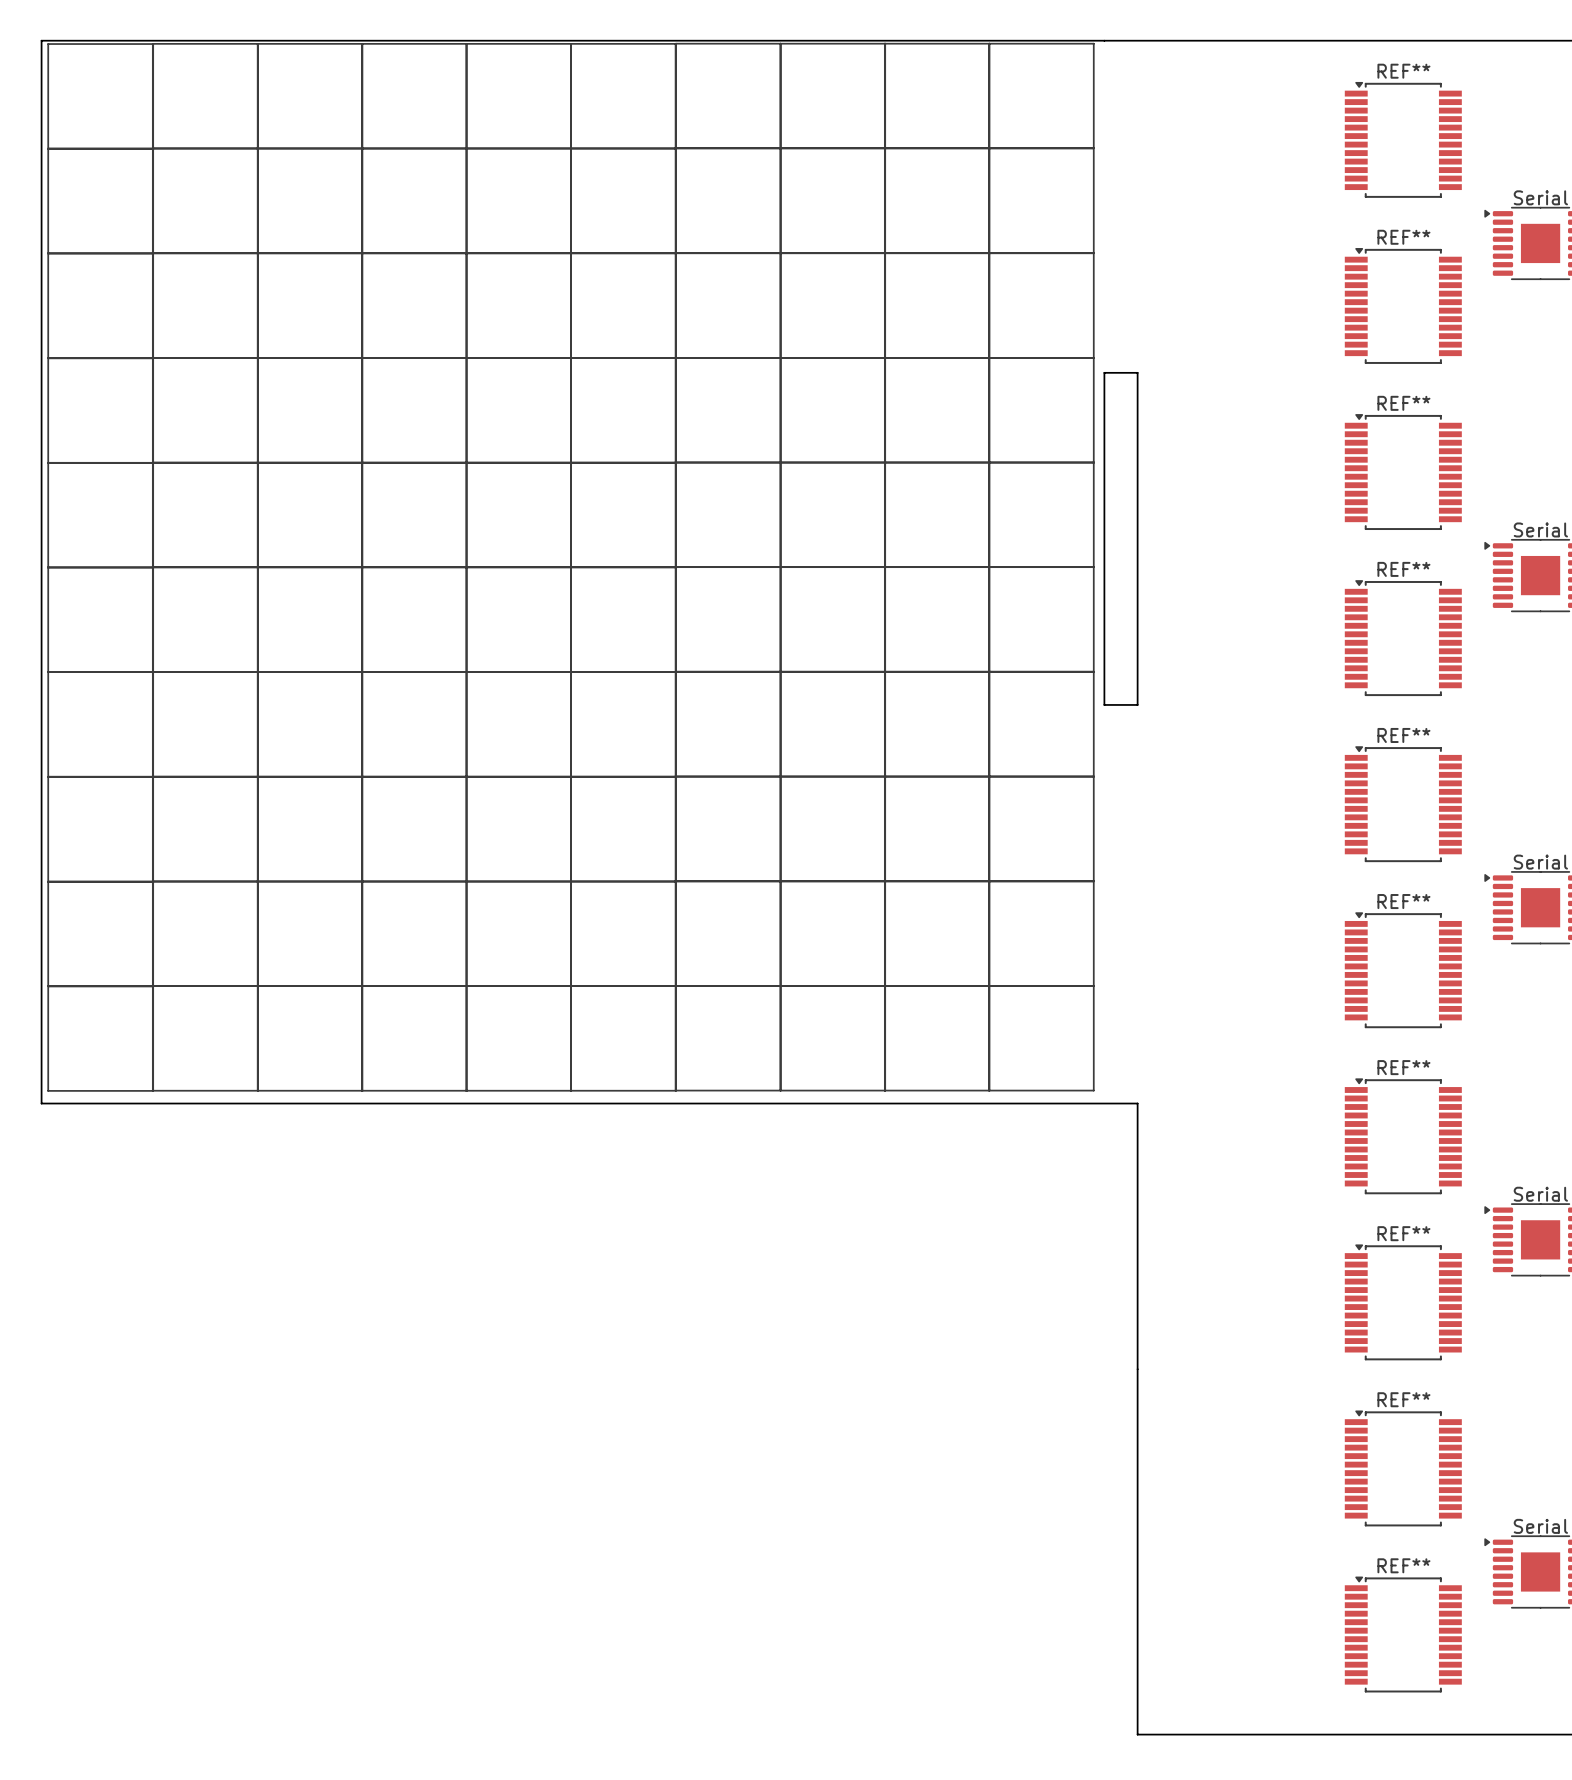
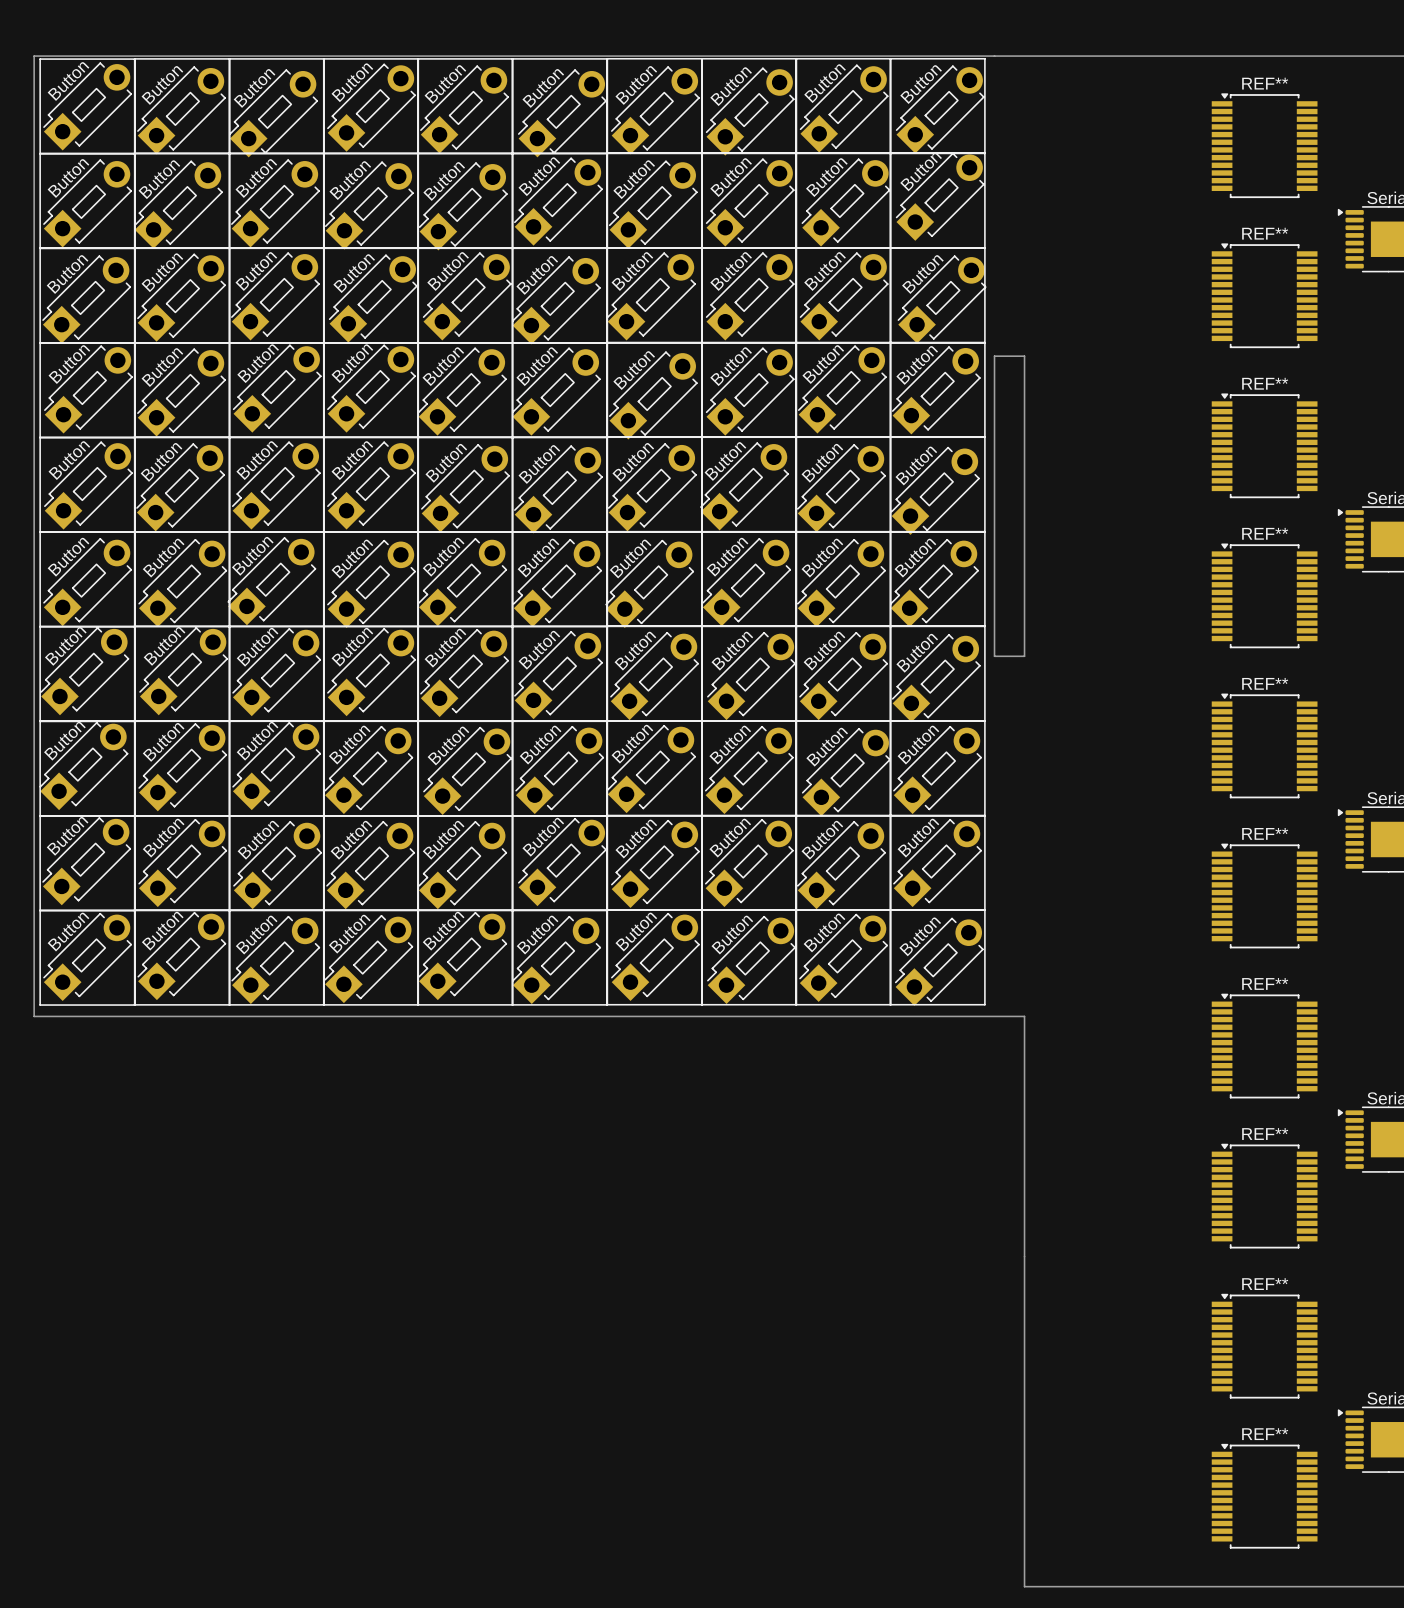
Button: none -> (87, 106)
Button: none -> (371, 107)
Button: none -> (844, 108)
Button: none -> (464, 109)
Button: none -> (940, 109)
Button: none -> (181, 110)
Button: none -> (655, 110)
Button: none -> (750, 111)
Button: none -> (273, 113)
Button: none -> (562, 113)
Button: none -> (940, 196)
Button: none -> (558, 201)
Button: none -> (750, 202)
Button: none -> (845, 202)
Button: none -> (87, 203)
Button: none -> (275, 203)
Button: none -> (178, 204)
Button: none -> (653, 204)
Button: none -> (369, 205)
Button: none -> (463, 206)
Button: none -> (275, 296)
Button: none -> (467, 296)
Button: none -> (651, 296)
Button: none -> (750, 296)
Button: none -> (844, 296)
Button: none -> (181, 297)
Button: none -> (373, 298)
Button: none -> (86, 299)
Button: none -> (941, 299)
Button: none -> (556, 300)
Button: none -> (277, 388)
Button: none -> (371, 388)
Button: none -> (88, 389)
Button: none -> (842, 389)
Button: none -> (936, 390)
Button: none -> (462, 391)
Button: none -> (556, 391)
Button: none -> (750, 391)
Button: none -> (181, 392)
Button: none -> (653, 395)
Button: none -> (88, 485)
Button: none -> (276, 485)
Button: none -> (371, 485)
Button: none -> (744, 486)
Button: none -> (180, 487)
Button: none -> (652, 487)
Button: none -> (465, 488)
Button: none -> (841, 488)
Button: none -> (558, 489)
Button: none -> (935, 490)
Button: none -> (271, 581)
Button: none -> (87, 582)
Button: none -> (462, 582)
Button: none -> (746, 582)
Button: none -> (182, 583)
Button: none -> (557, 583)
Button: none -> (841, 583)
Button: none -> (934, 583)
Button: none -> (371, 583)
Button: none -> (649, 583)
Button: none -> (84, 671)
Button: none -> (183, 671)
Button: none -> (276, 672)
Button: none -> (371, 672)
Button: none -> (464, 673)
Button: none -> (558, 675)
Button: none -> (654, 676)
Button: none -> (751, 676)
Button: none -> (843, 676)
Button: none -> (936, 678)
Button: none -> (83, 766)
Button: none -> (276, 766)
Button: none -> (182, 767)
Button: none -> (651, 769)
Button: none -> (368, 770)
Button: none -> (559, 770)
Button: none -> (749, 770)
Button: none -> (937, 770)
Button: none -> (467, 770)
Button: none -> (846, 772)
Button: none -> (86, 861)
Button: none -> (562, 862)
Button: none -> (182, 863)
Button: none -> (749, 863)
Button: none -> (937, 863)
Button: none -> (655, 863)
Button: none -> (277, 865)
Button: none -> (370, 865)
Button: none -> (462, 865)
Button: none -> (841, 865)
Button: none -> (181, 956)
Button: none -> (462, 956)
Button: none -> (87, 956)
Button: none -> (655, 956)
Button: none -> (843, 957)
Button: none -> (368, 959)
Button: none -> (275, 959)
Button: none -> (556, 959)
Button: none -> (751, 959)
Button: none -> (939, 961)

